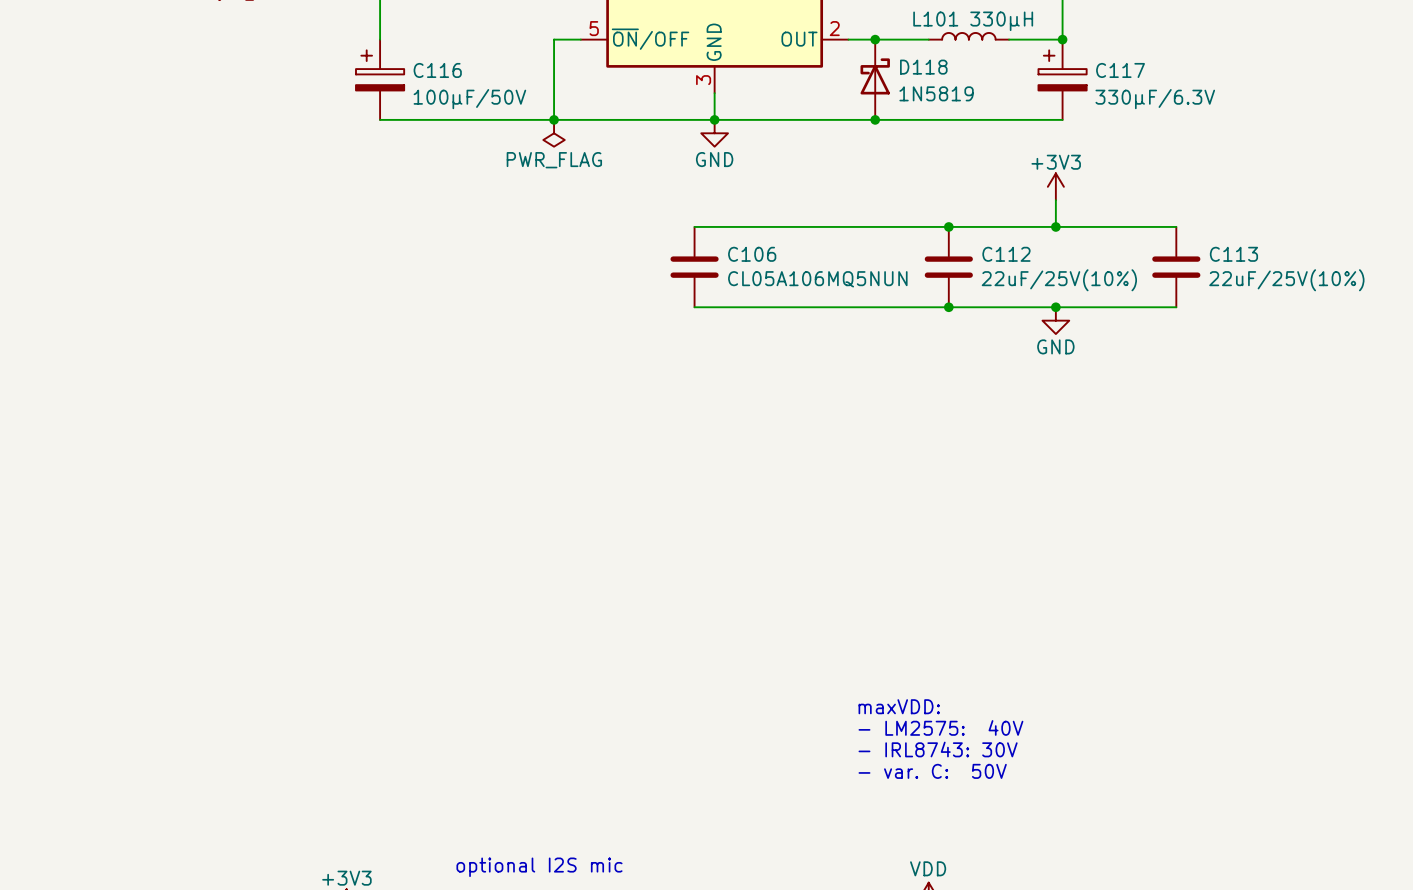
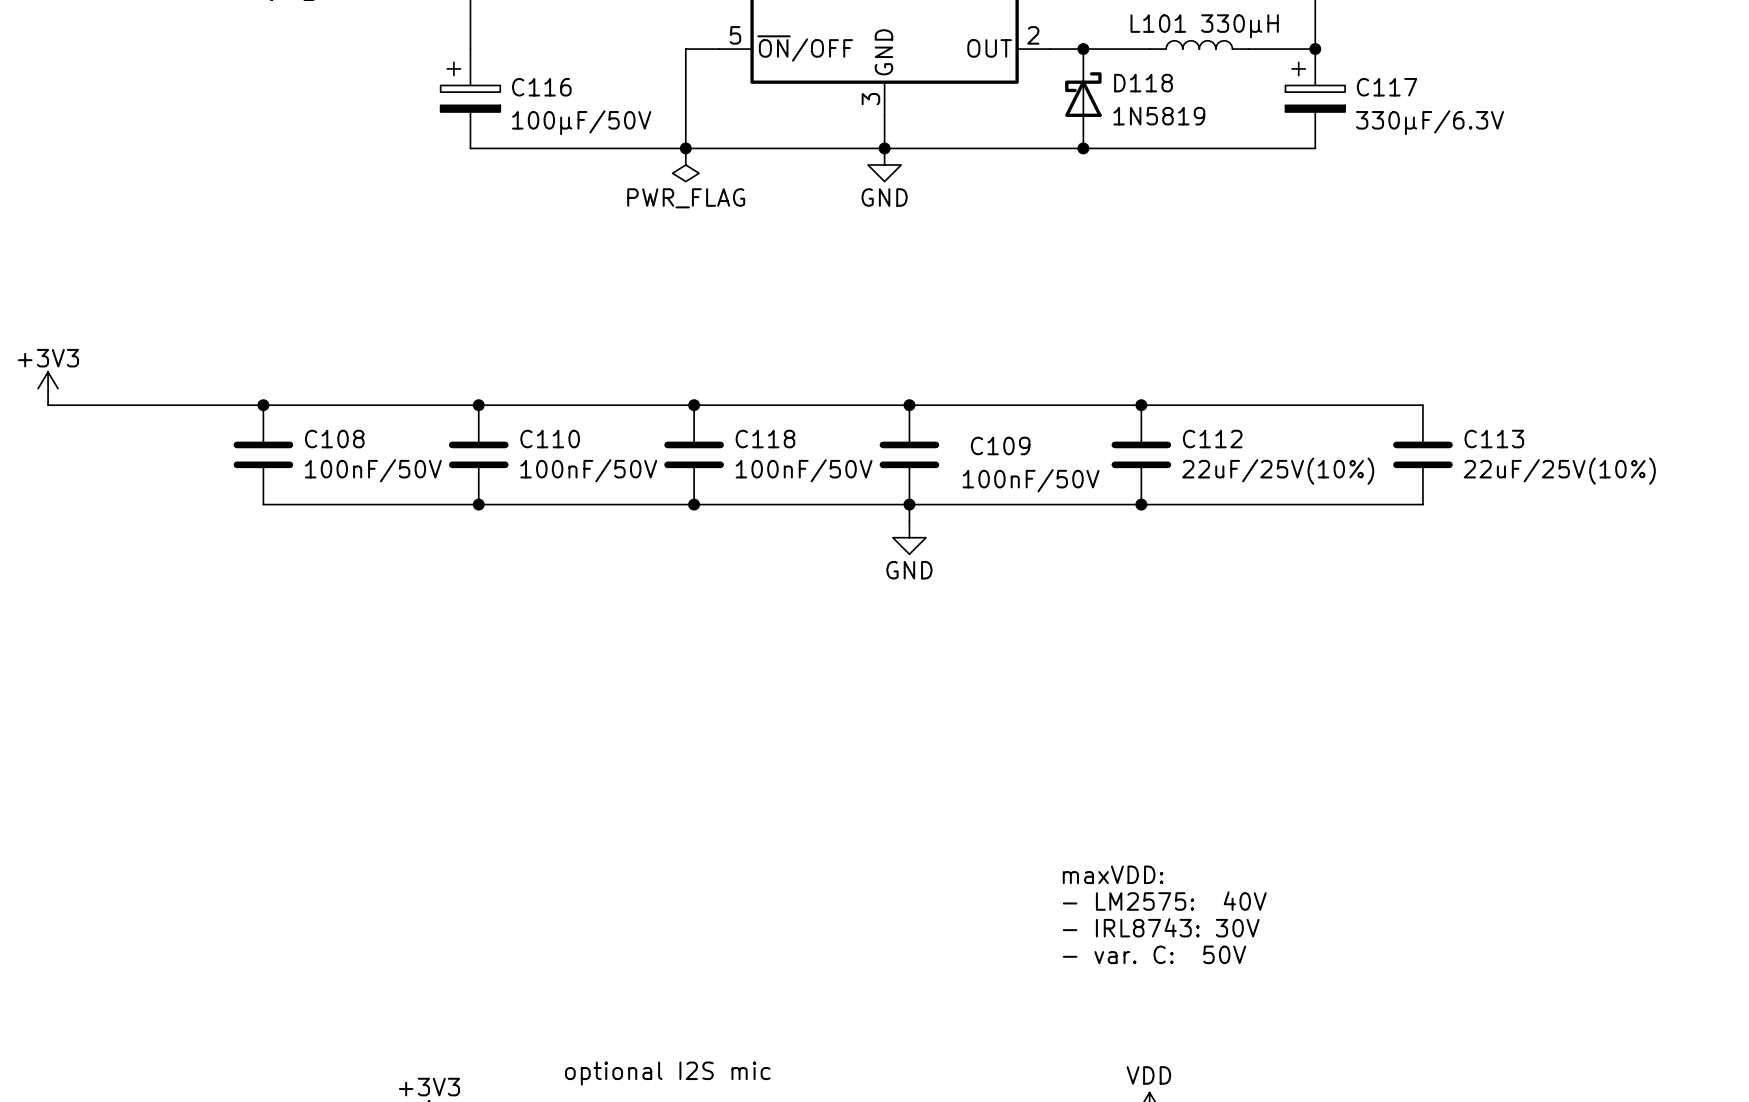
power symbol: +3V3 (1055, 186) -> none
wire: (1055, 200) (1055, 226) -> none
wire: (694, 226) (1176, 226) -> none
junction: (948, 226) -> none
junction: (1055, 226) -> none
C106: CL05A106MQ5NUN (694, 267) -> none
C112 position: (948, 267) -> (1141, 454)
C113 position: (1176, 267) -> (1422, 454)
wire: (694, 307) (1176, 307) -> none
junction position: (948, 307) -> (1141, 405)
junction: (1055, 307) -> none
power symbol: none -> +3V3 (48, 388)
power symbol: GND (1055, 320) -> none
wire: none -> (48, 405) (1422, 405)
junction: none -> (263, 405)
junction: none -> (478, 405)
junction: none -> (694, 405)
junction: none -> (909, 405)
C108: none -> 100nF/50V (263, 454)
C110: none -> 100nF/50V (478, 454)
C118: none -> 100nF/50V (694, 454)
C109: none -> 100nF/50V (909, 454)
wire: none -> (263, 504) (1422, 504)
junction: none -> (478, 504)
junction: none -> (694, 504)
wire: none -> (909, 504) (909, 521)
junction: none -> (909, 504)
junction: none -> (1141, 504)
power symbol: none -> GND (909, 537)

